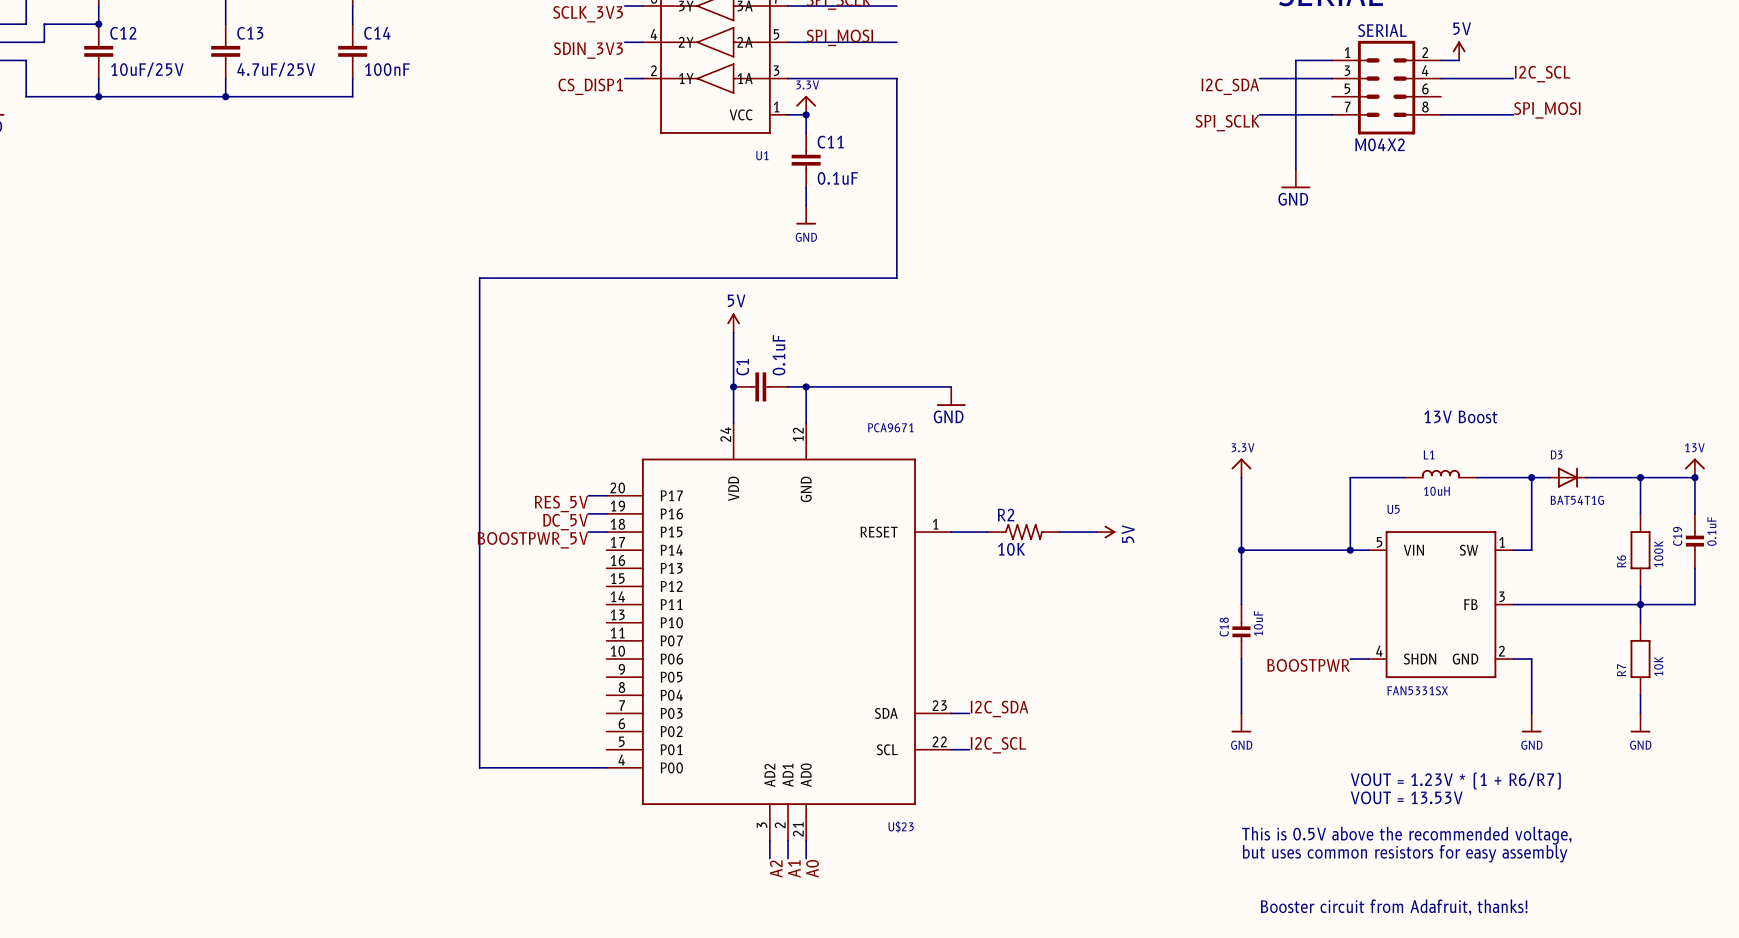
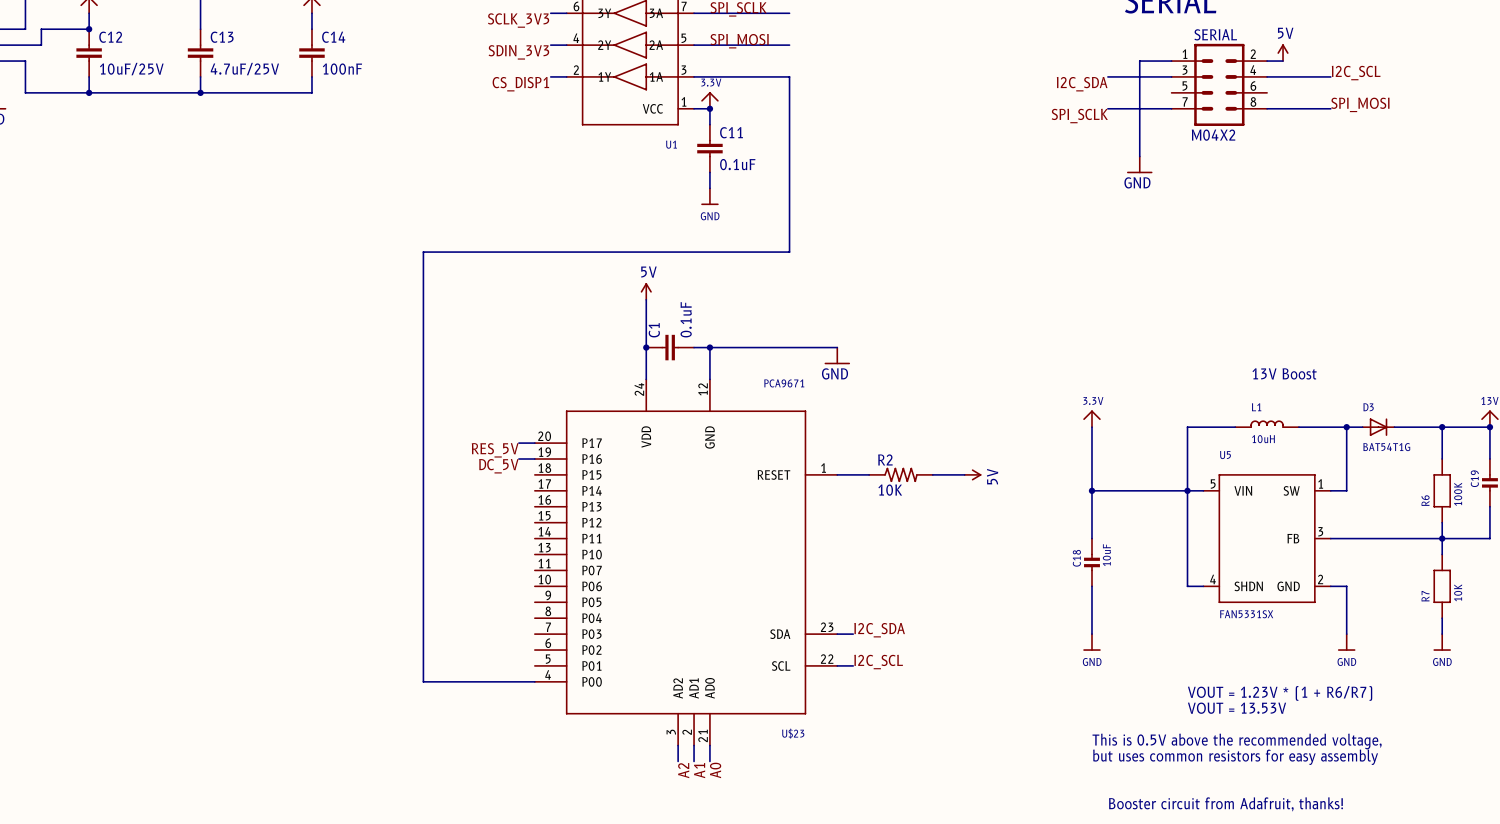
wire: (588, 532) (606, 532) -> none
label: BOOSTPWR_5V (532, 540) -> none
wire: none -> (1187, 490) (1187, 586)
label: BOOSTPWR (1308, 665) -> none

